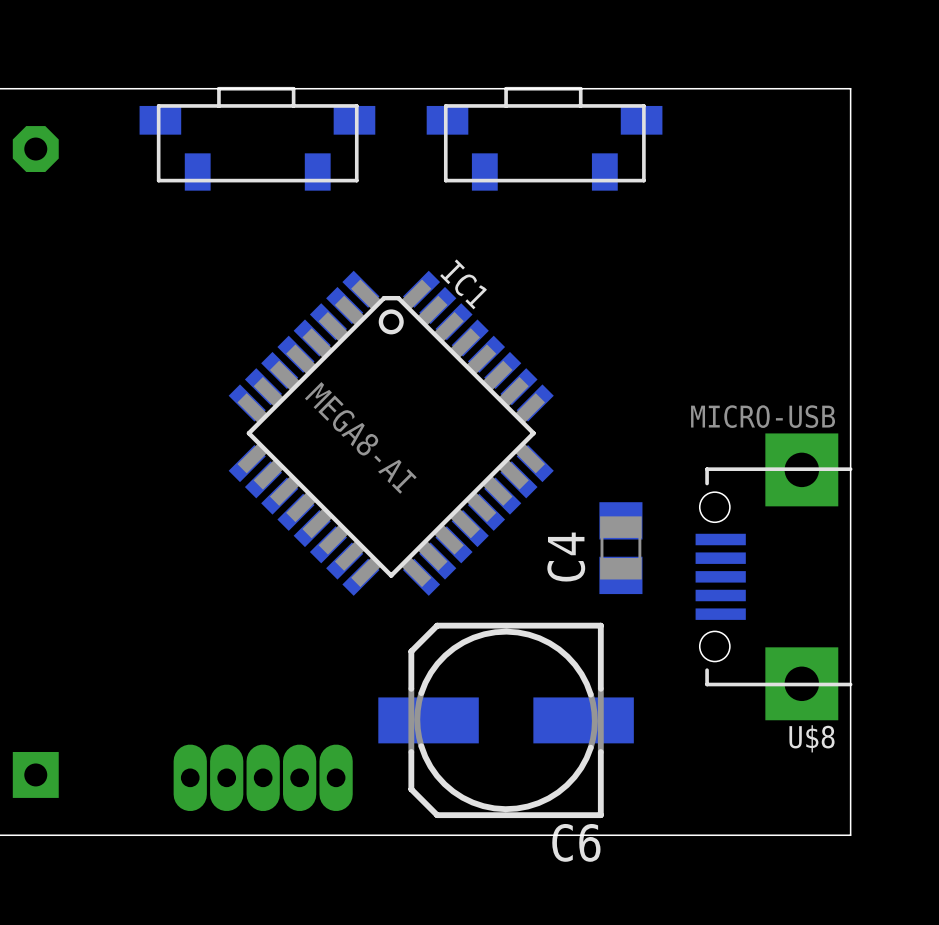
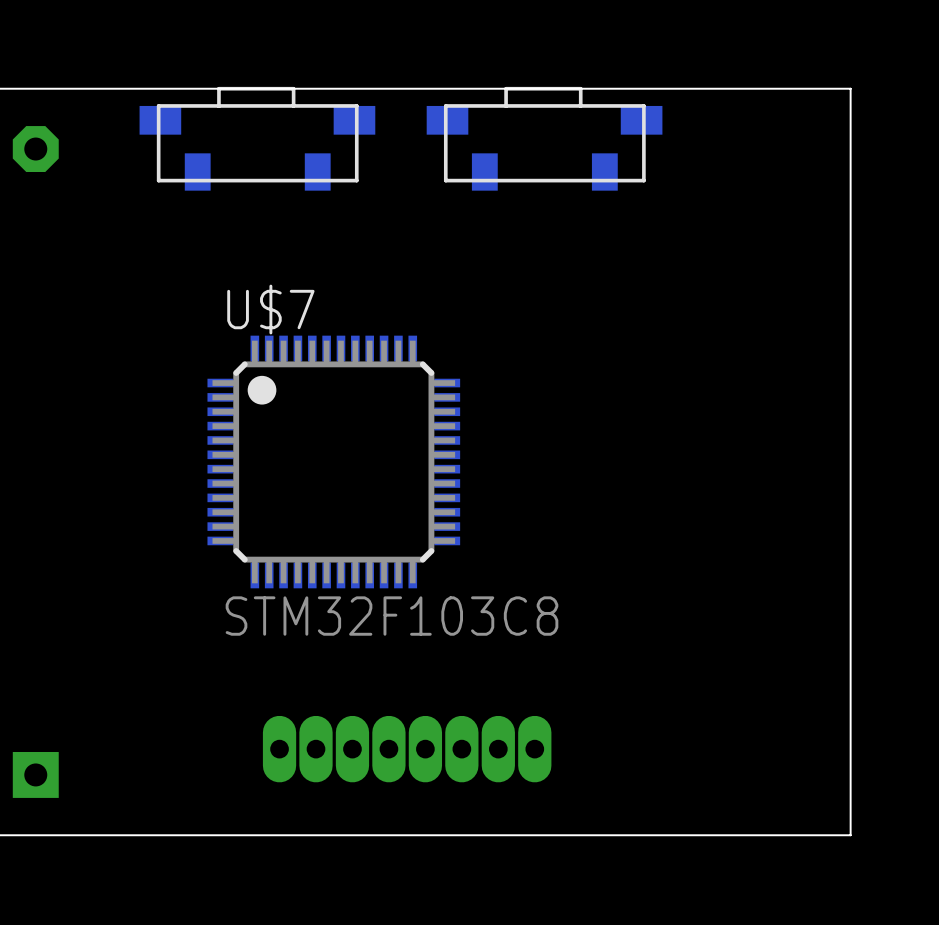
IC1: MEGA8-AI (391, 433) -> none
U$7: none -> STM32F103C8 (333, 461)
C4: (620, 548) -> none
U$8: MICRO-USB (774, 576) -> none
C6: (506, 720) -> none
part: none -> (407, 749)
part: (263, 777) -> none

